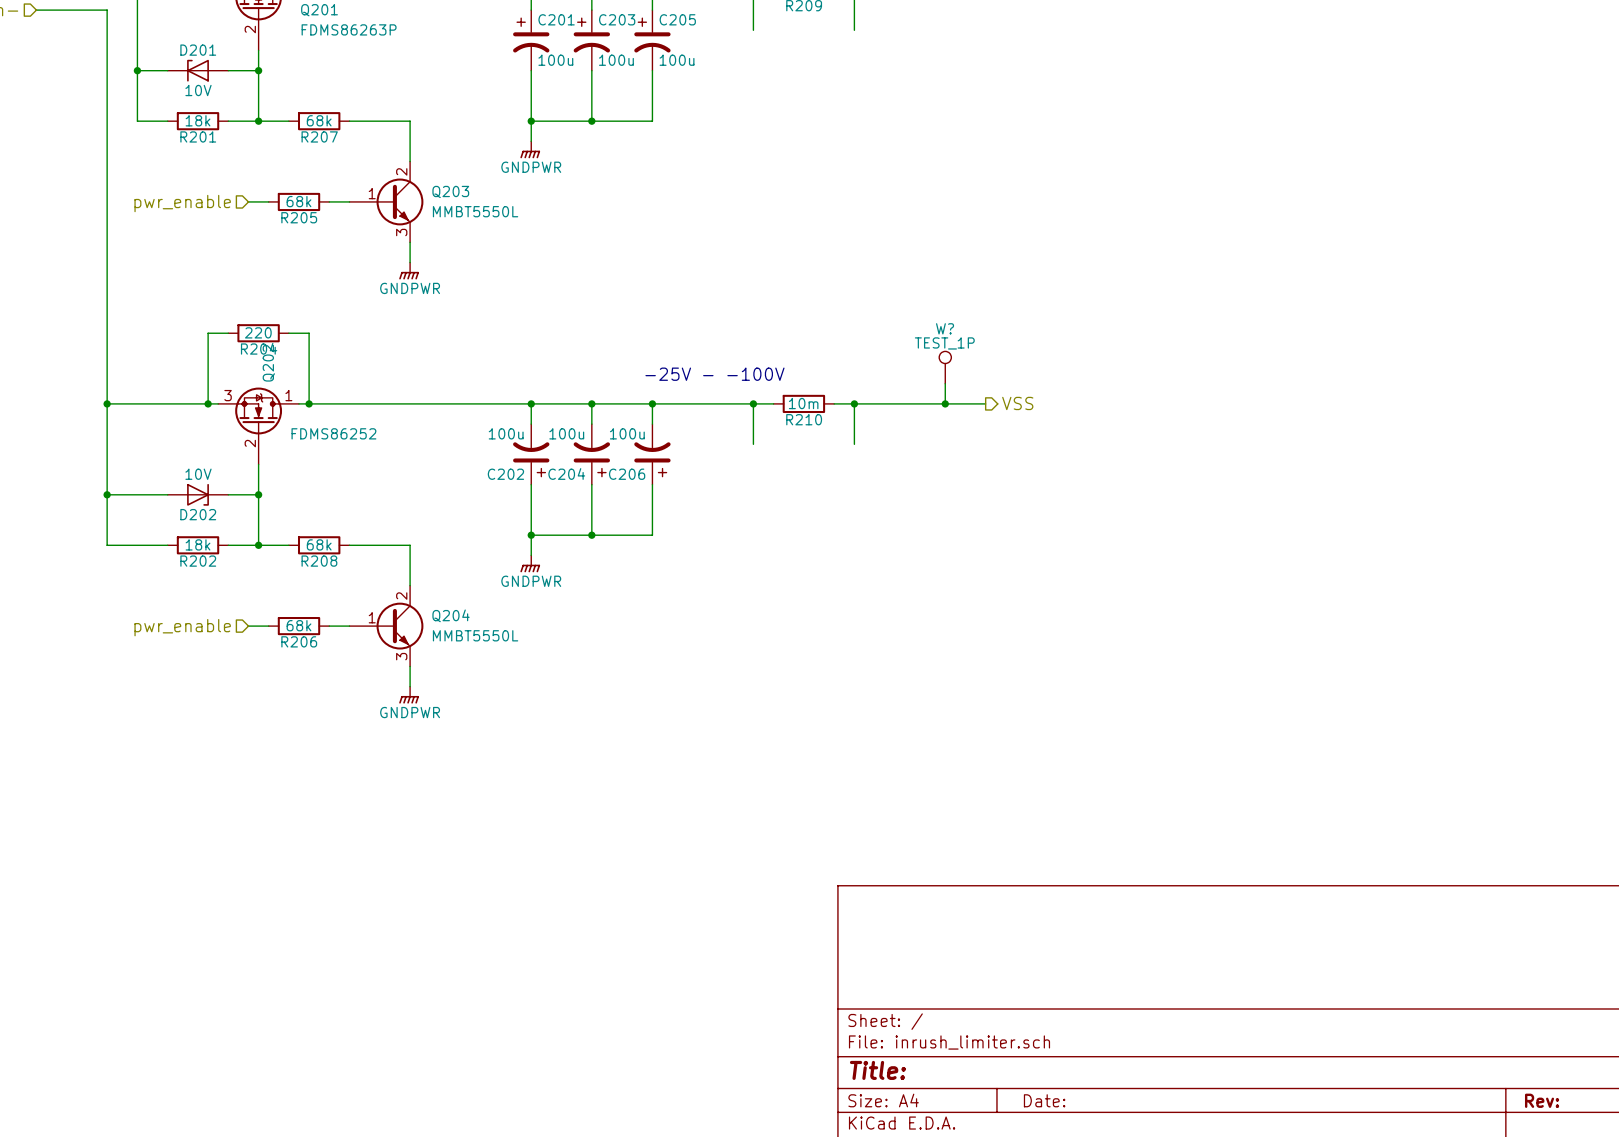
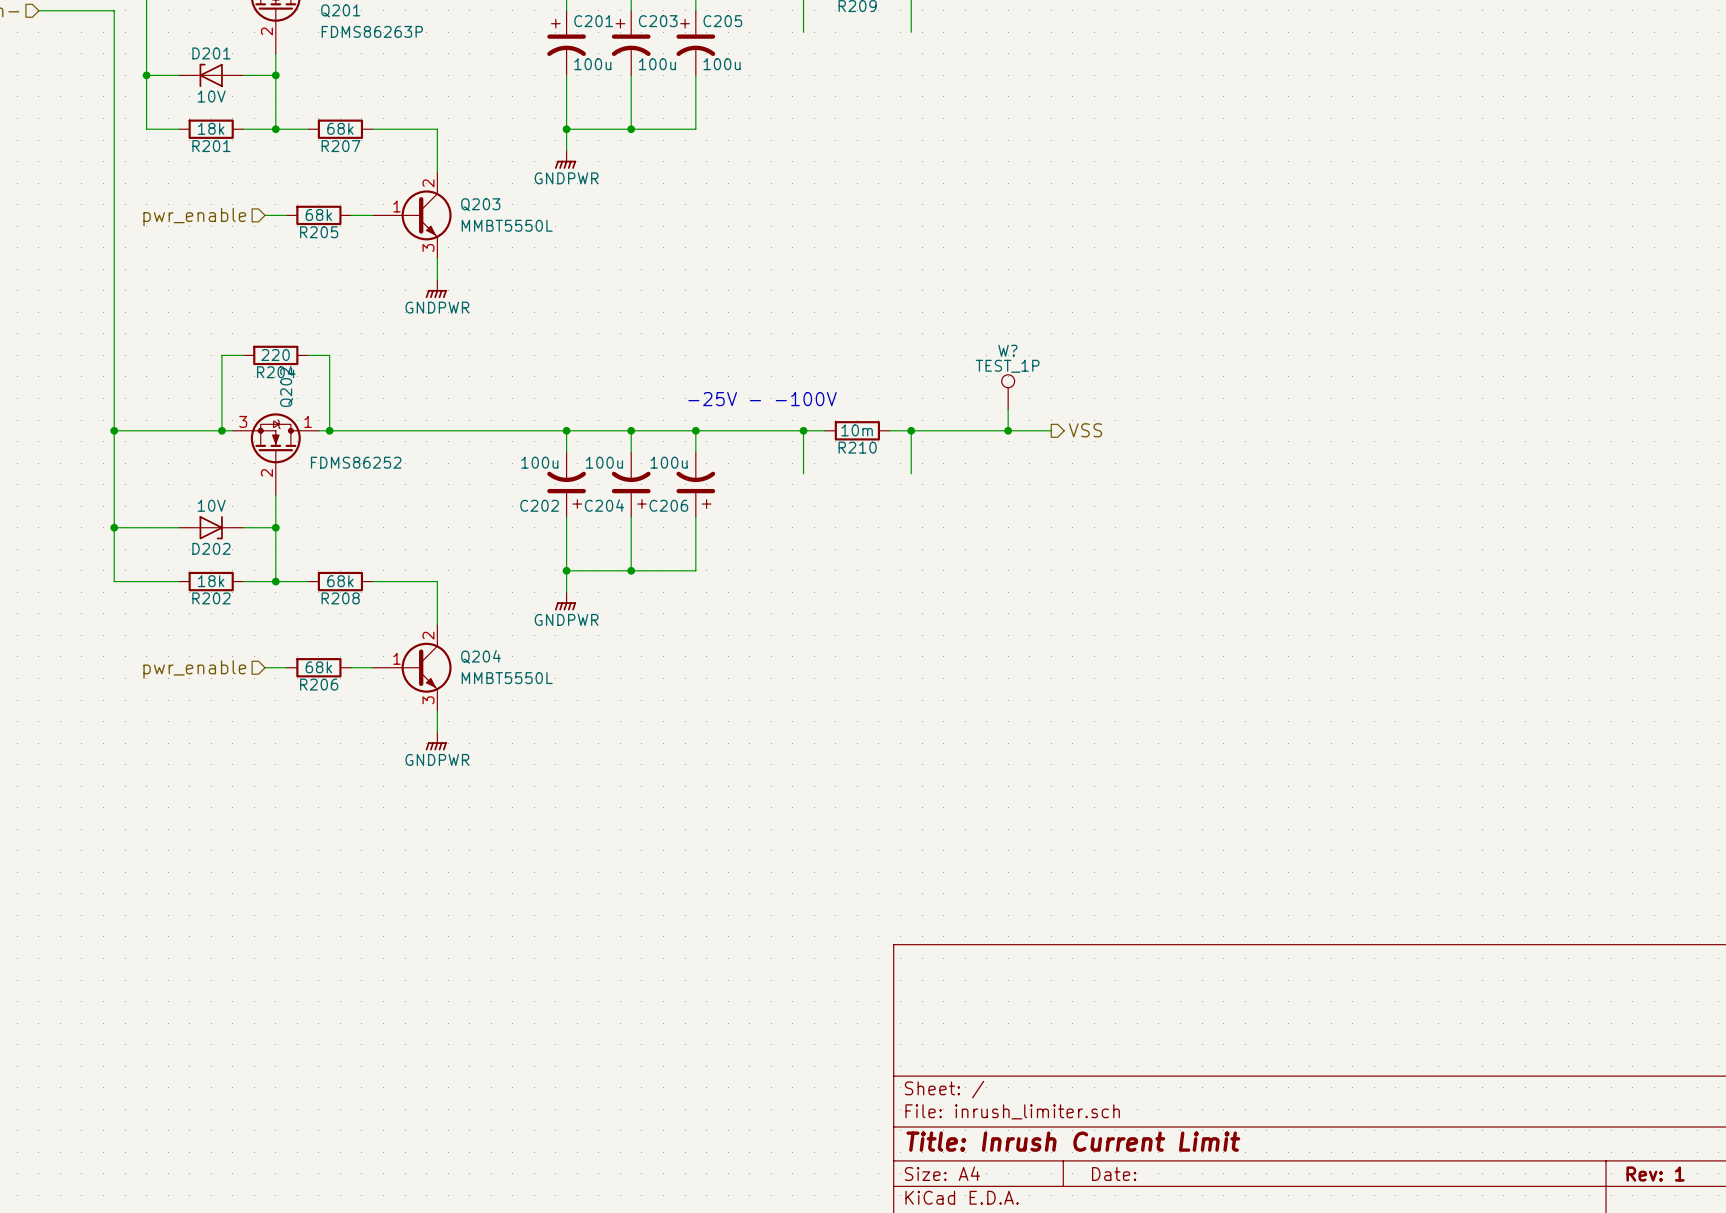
title block: Title: (877, 1070) -> Title: Inrush Current Limit (1073, 1141)
title block: Rev: (1542, 1100) -> Rev: 1 (1655, 1174)

